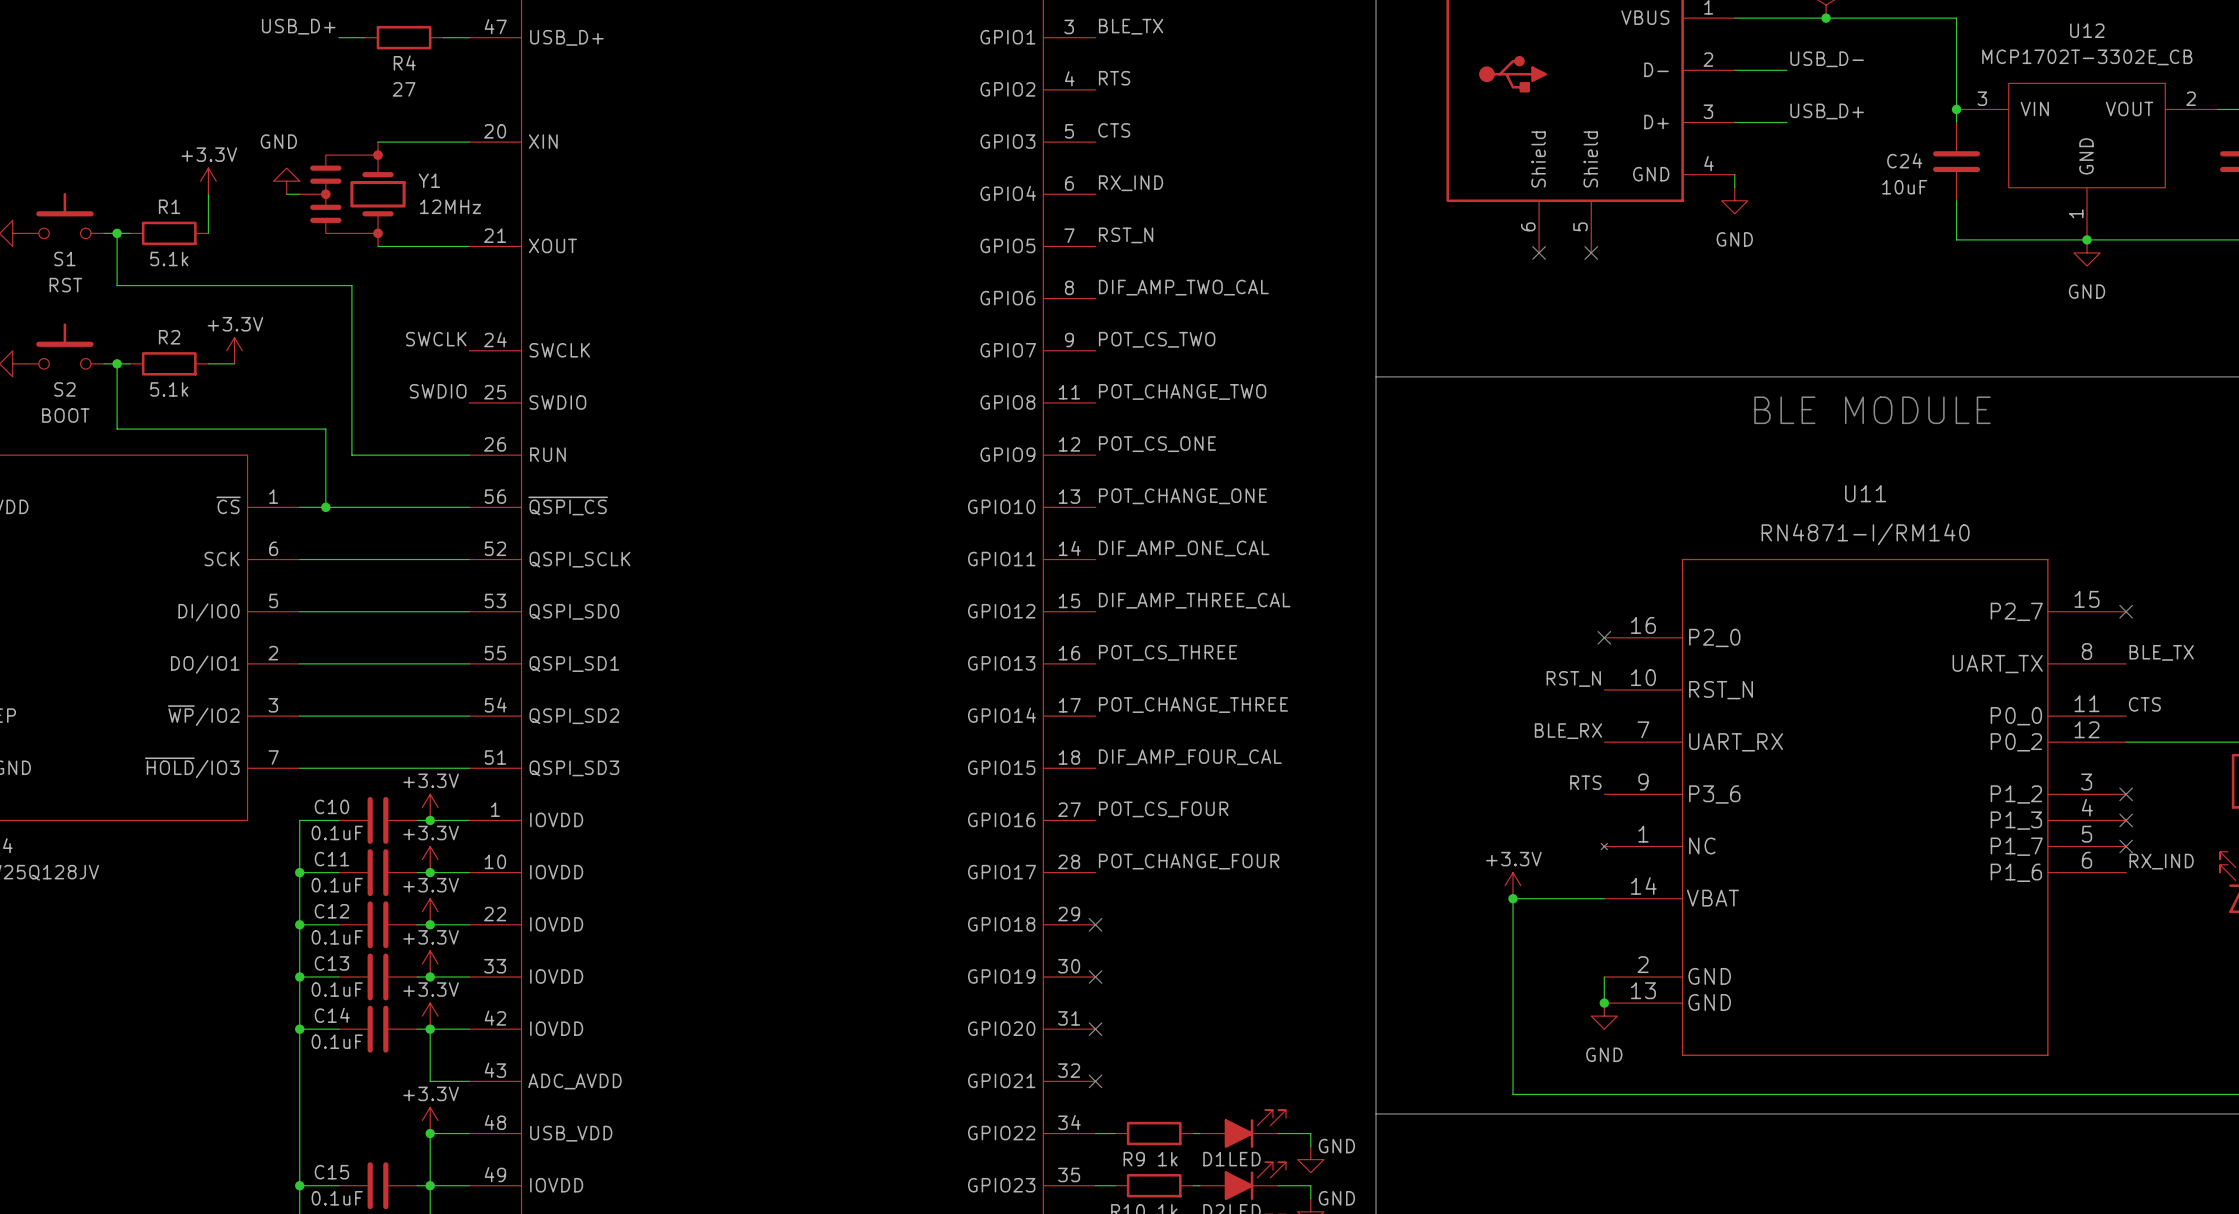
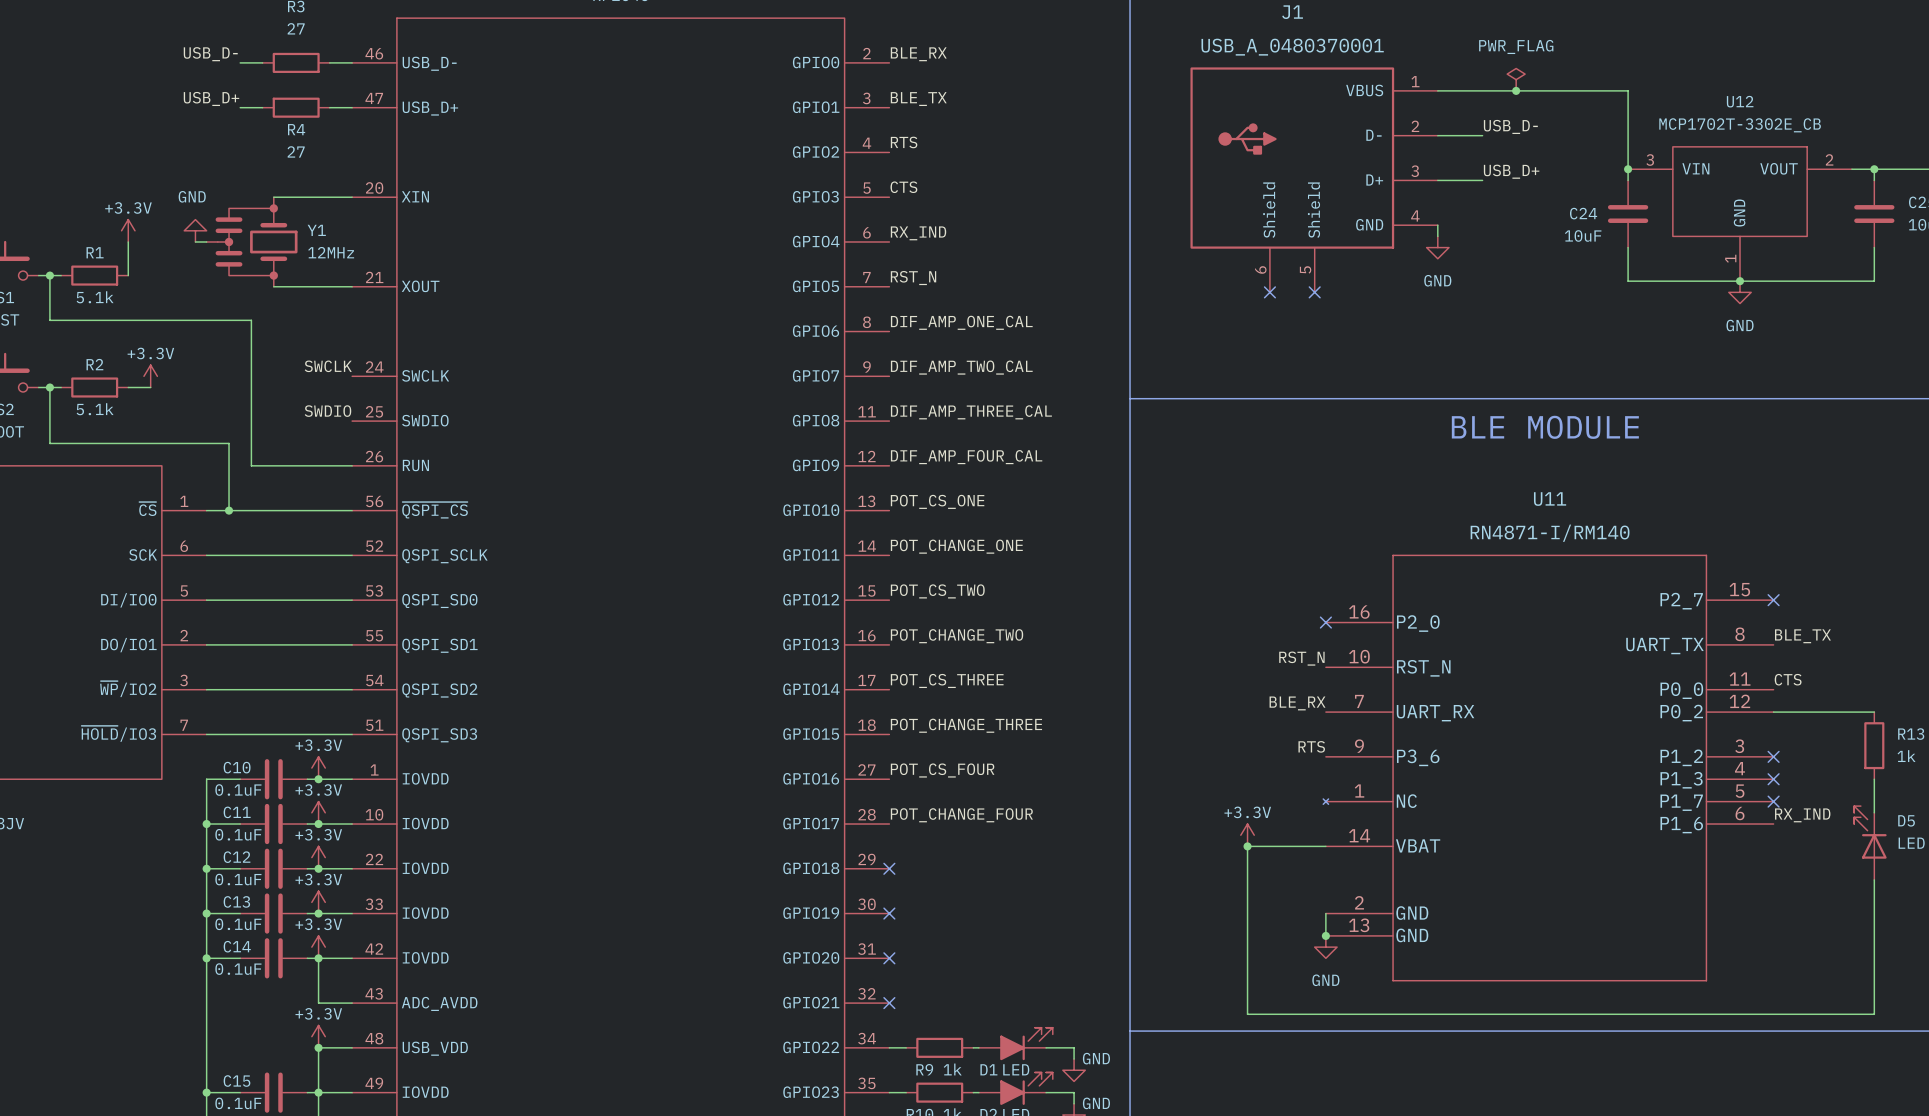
label: DIF_AMP_TWO_CAL (1183, 287) -> DIF_AMP_ONE_CAL (961, 322)
label: POT_CS_TWO (1157, 339) -> DIF_AMP_TWO_CAL (961, 367)
label: POT_CHANGE_TWO (1182, 391) -> DIF_AMP_THREE_CAL (971, 412)
label: POT_CS_ONE (1157, 444) -> DIF_AMP_FOUR_CAL (966, 457)
label: POT_CHANGE_ONE (1182, 496) -> POT_CS_ONE (937, 501)
label: DIF_AMP_ONE_CAL (1184, 548) -> POT_CHANGE_ONE (956, 546)
label: DIF_AMP_THREE_CAL (1194, 600) -> POT_CS_TWO (937, 591)
label: POT_CS_THREE (1168, 652) -> POT_CHANGE_TWO (957, 636)
label: POT_CHANGE_THREE (1193, 705) -> POT_CS_THREE (947, 680)
label: DIF_AMP_FOUR_CAL (1190, 757) -> POT_CHANGE_THREE (966, 725)

